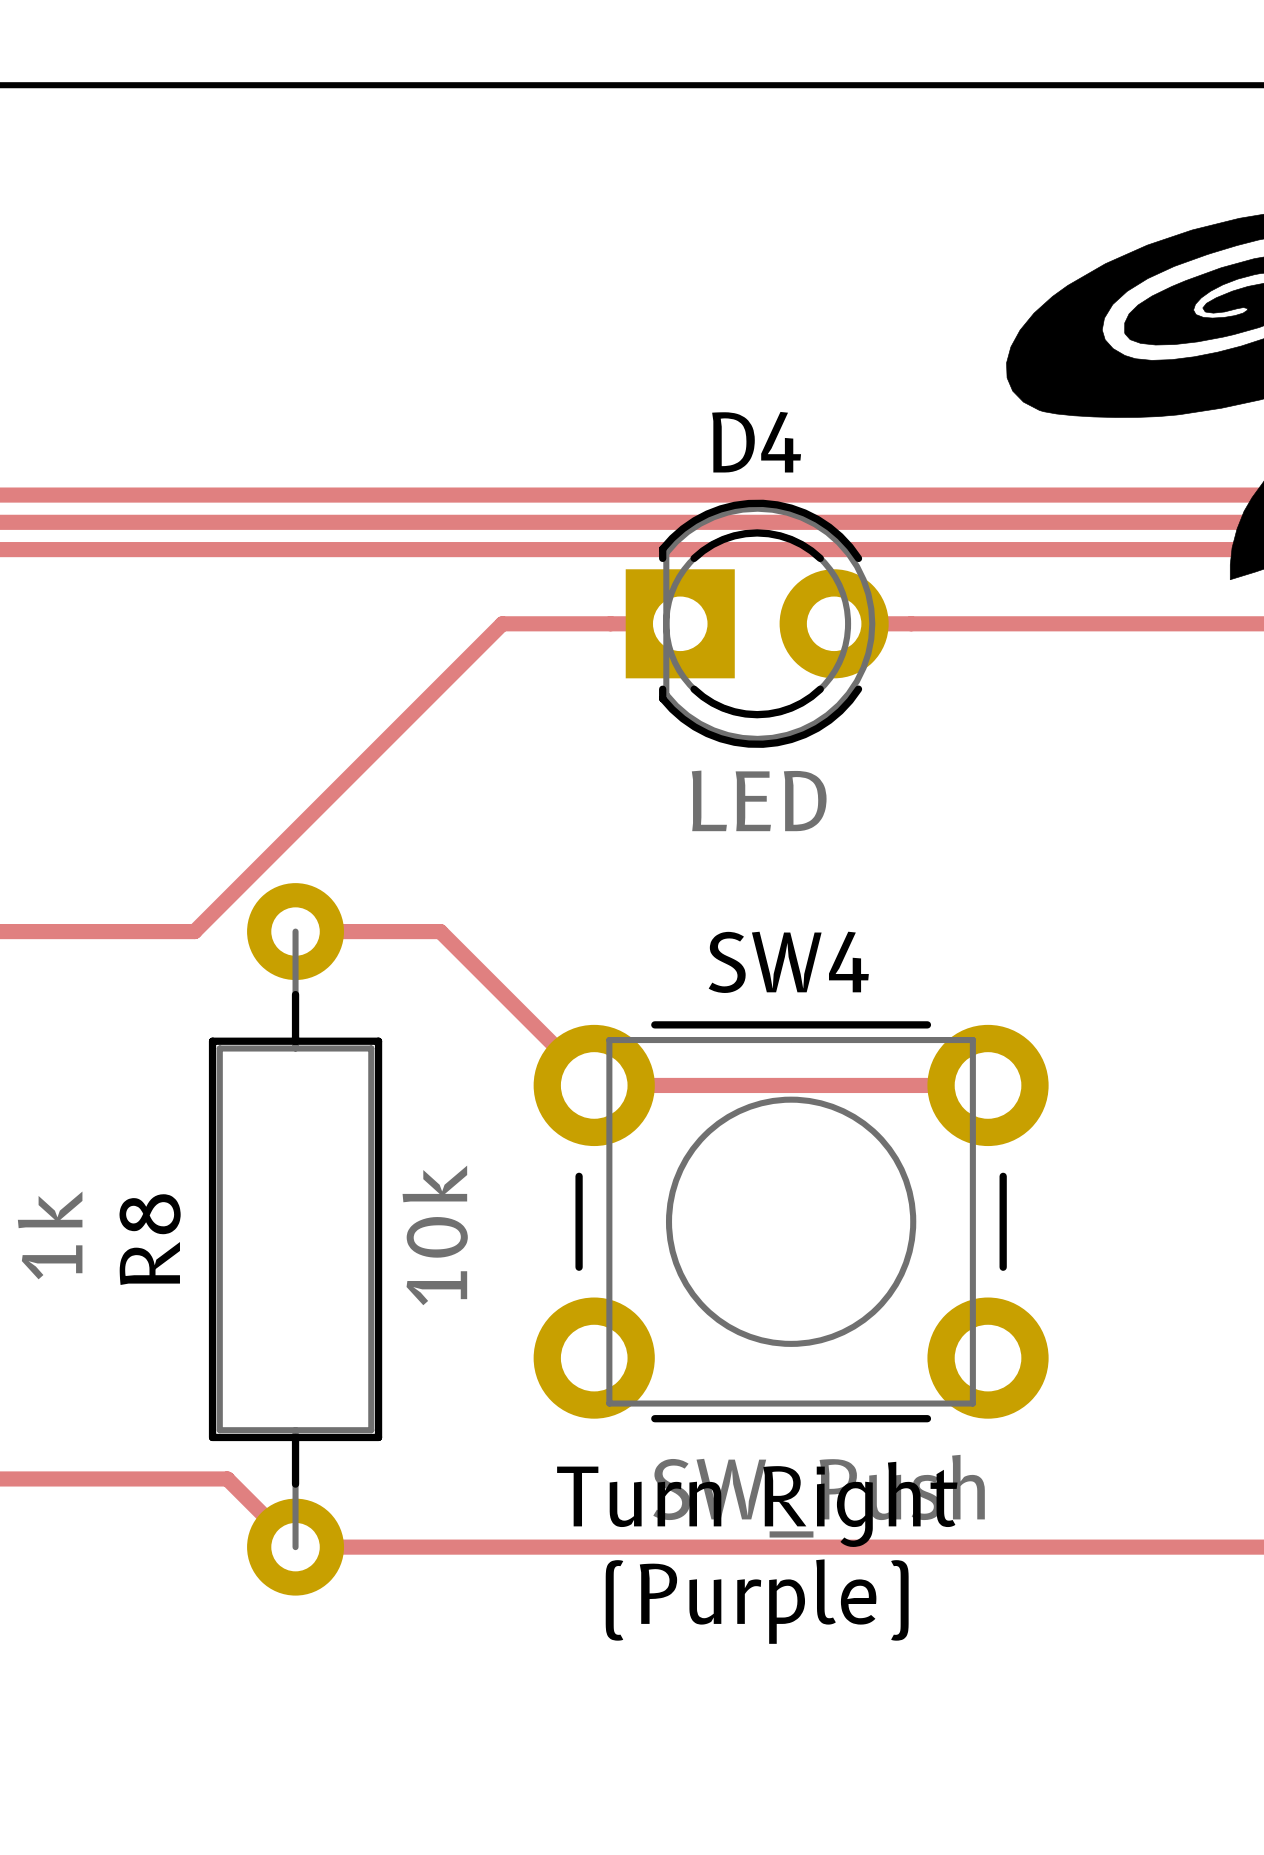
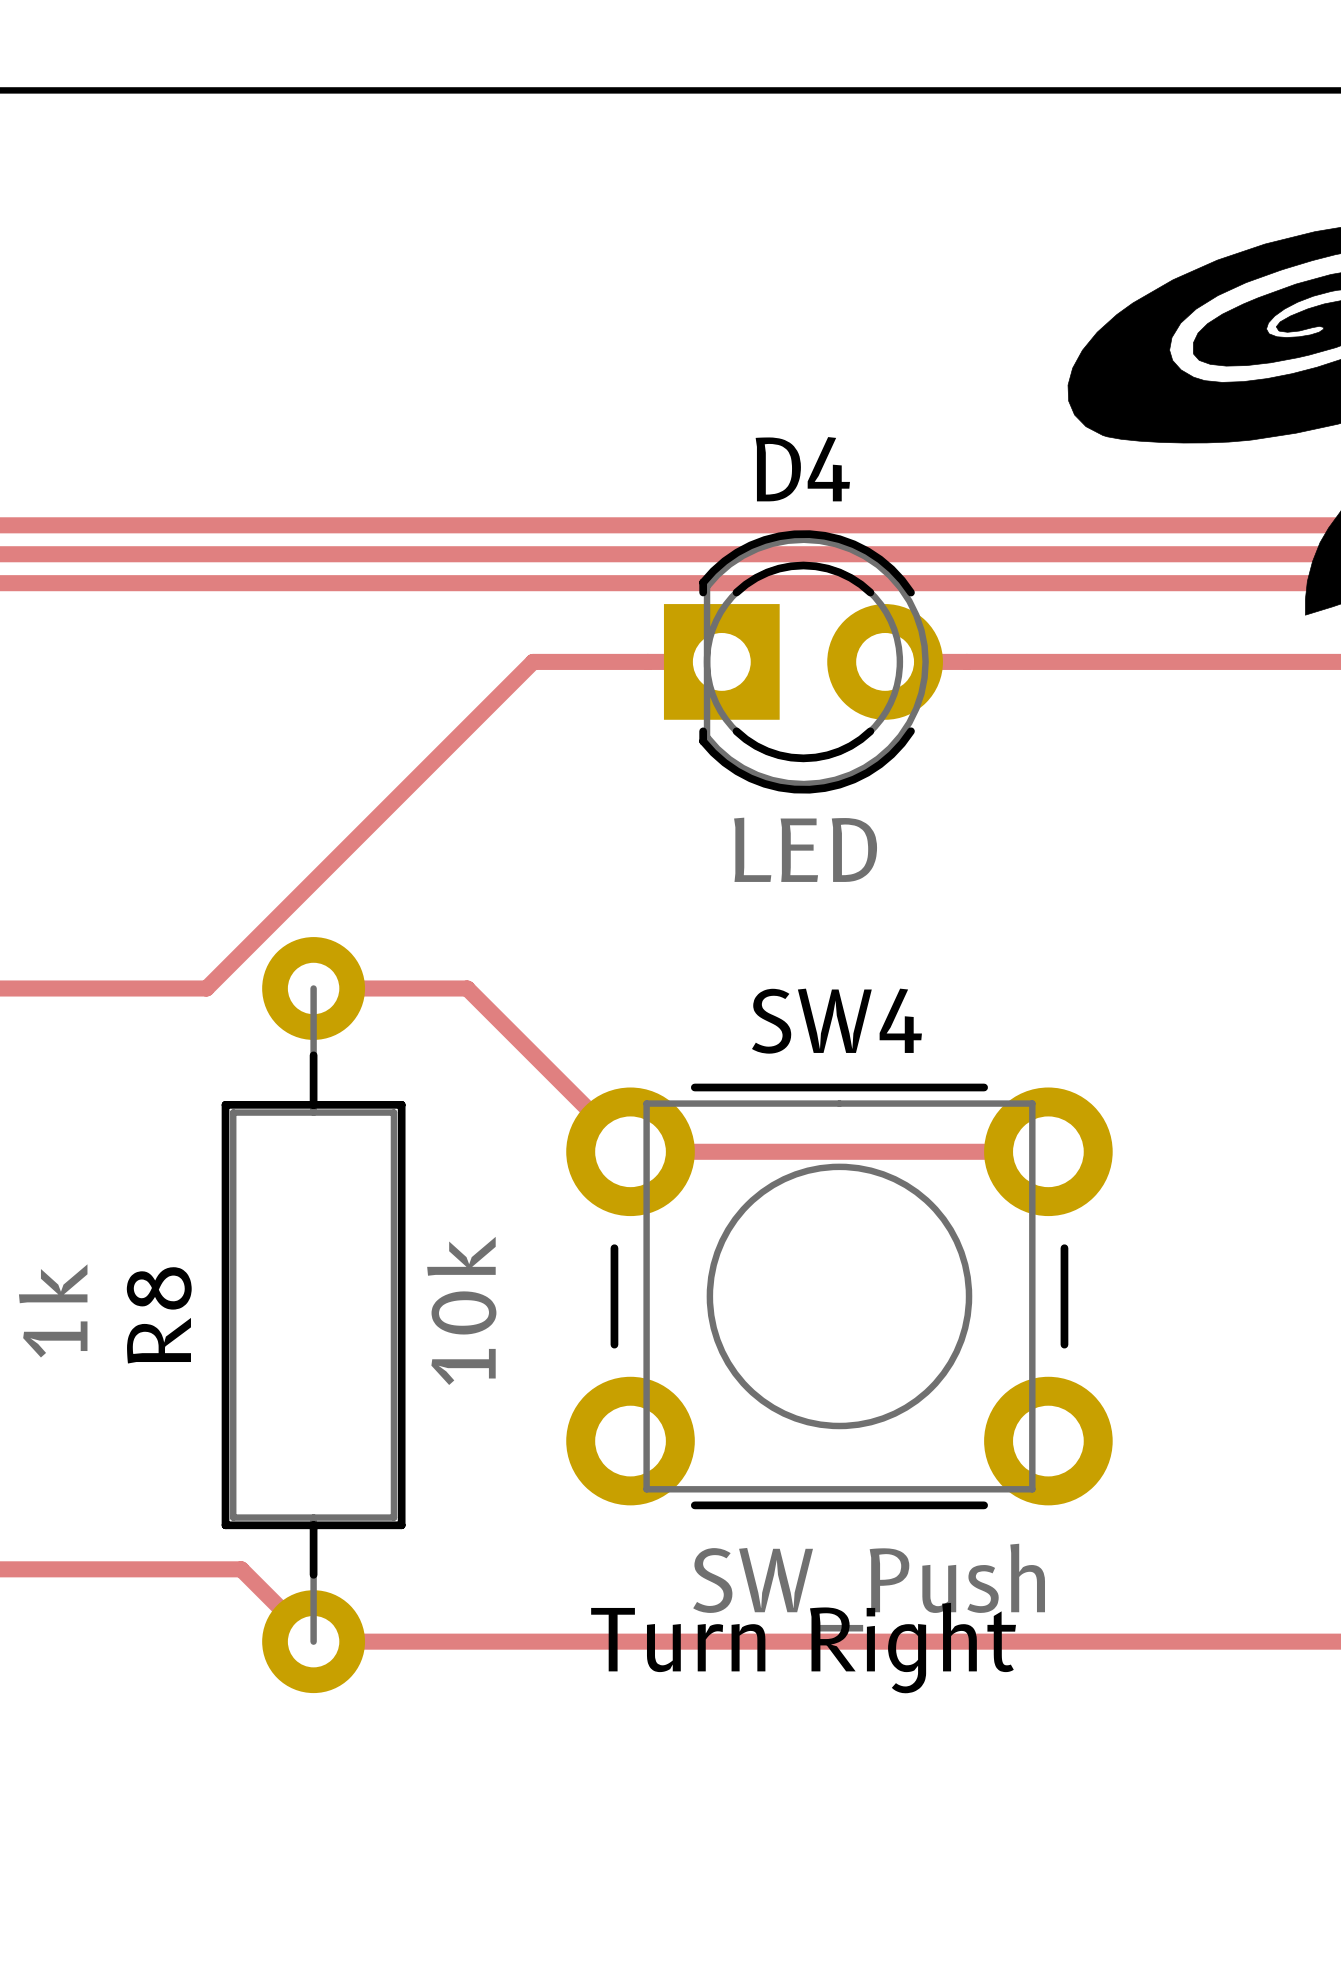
text position: Turn Right (757, 1504) -> Turn Right (803, 1648)
text: (Purple) (757, 1601) -> none

